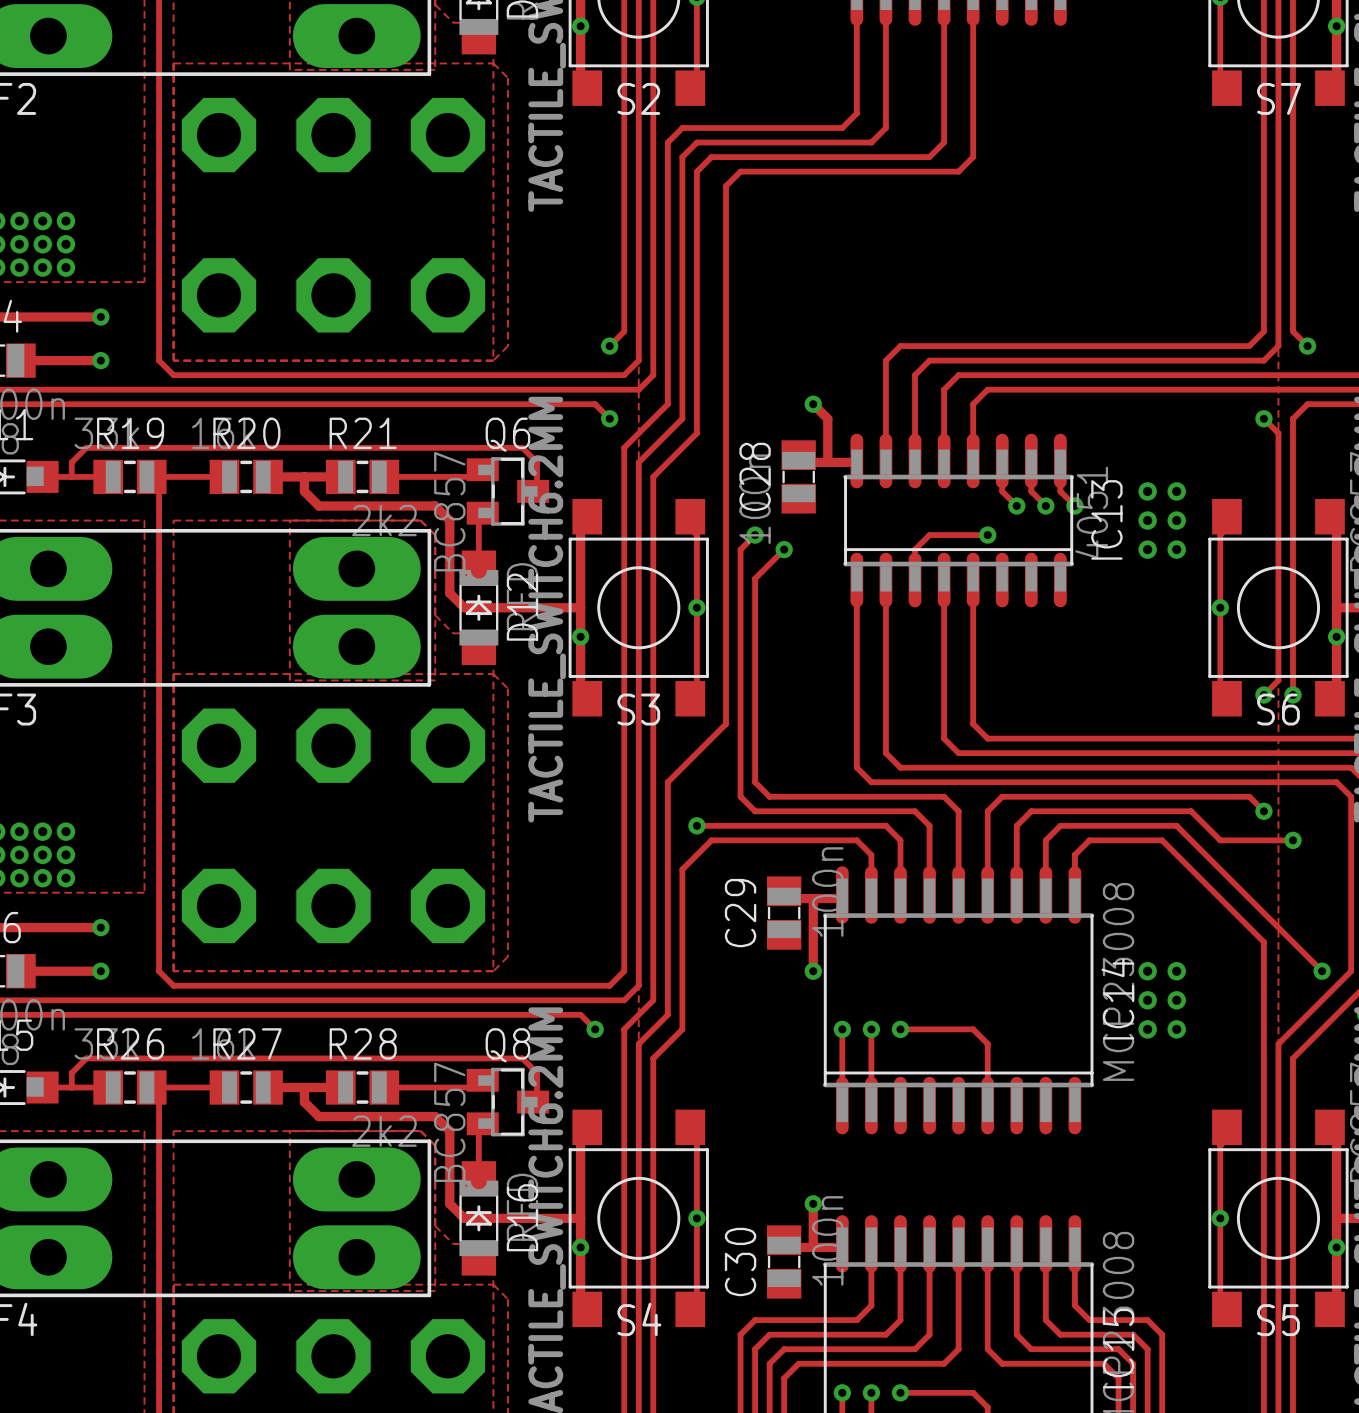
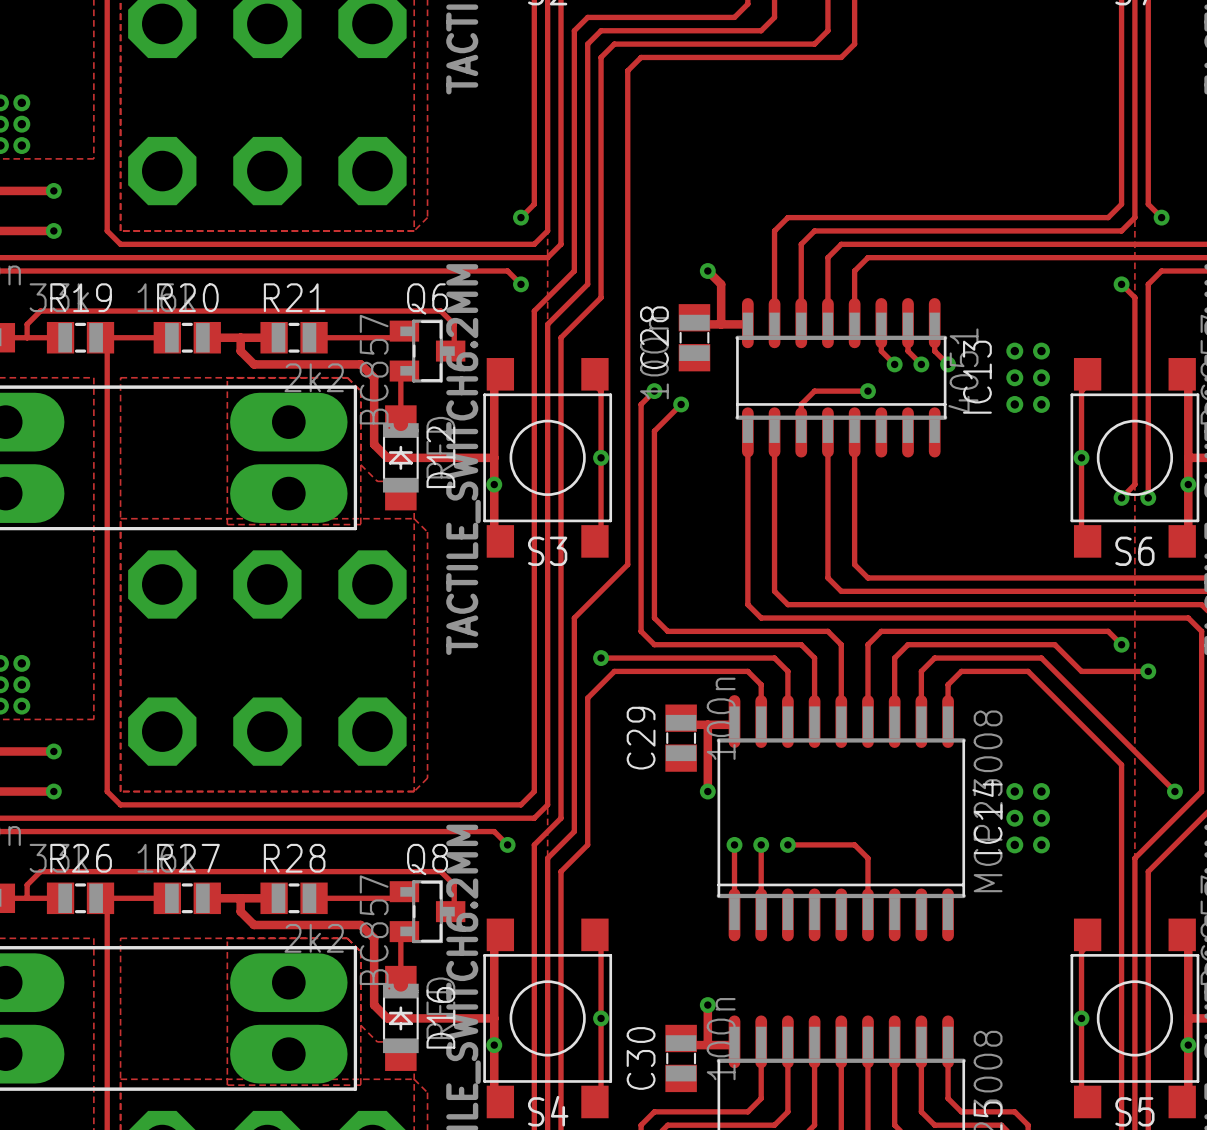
track: (1278, 636) (1278, 680) (1263, 694) -> (1134, 484) (1121, 497)
via: none -> (1121, 497)
track: (1293, 651) (1293, 694) -> none
via: none -> (1148, 497)
via: (1263, 694) -> none
via: (1293, 694) -> none

